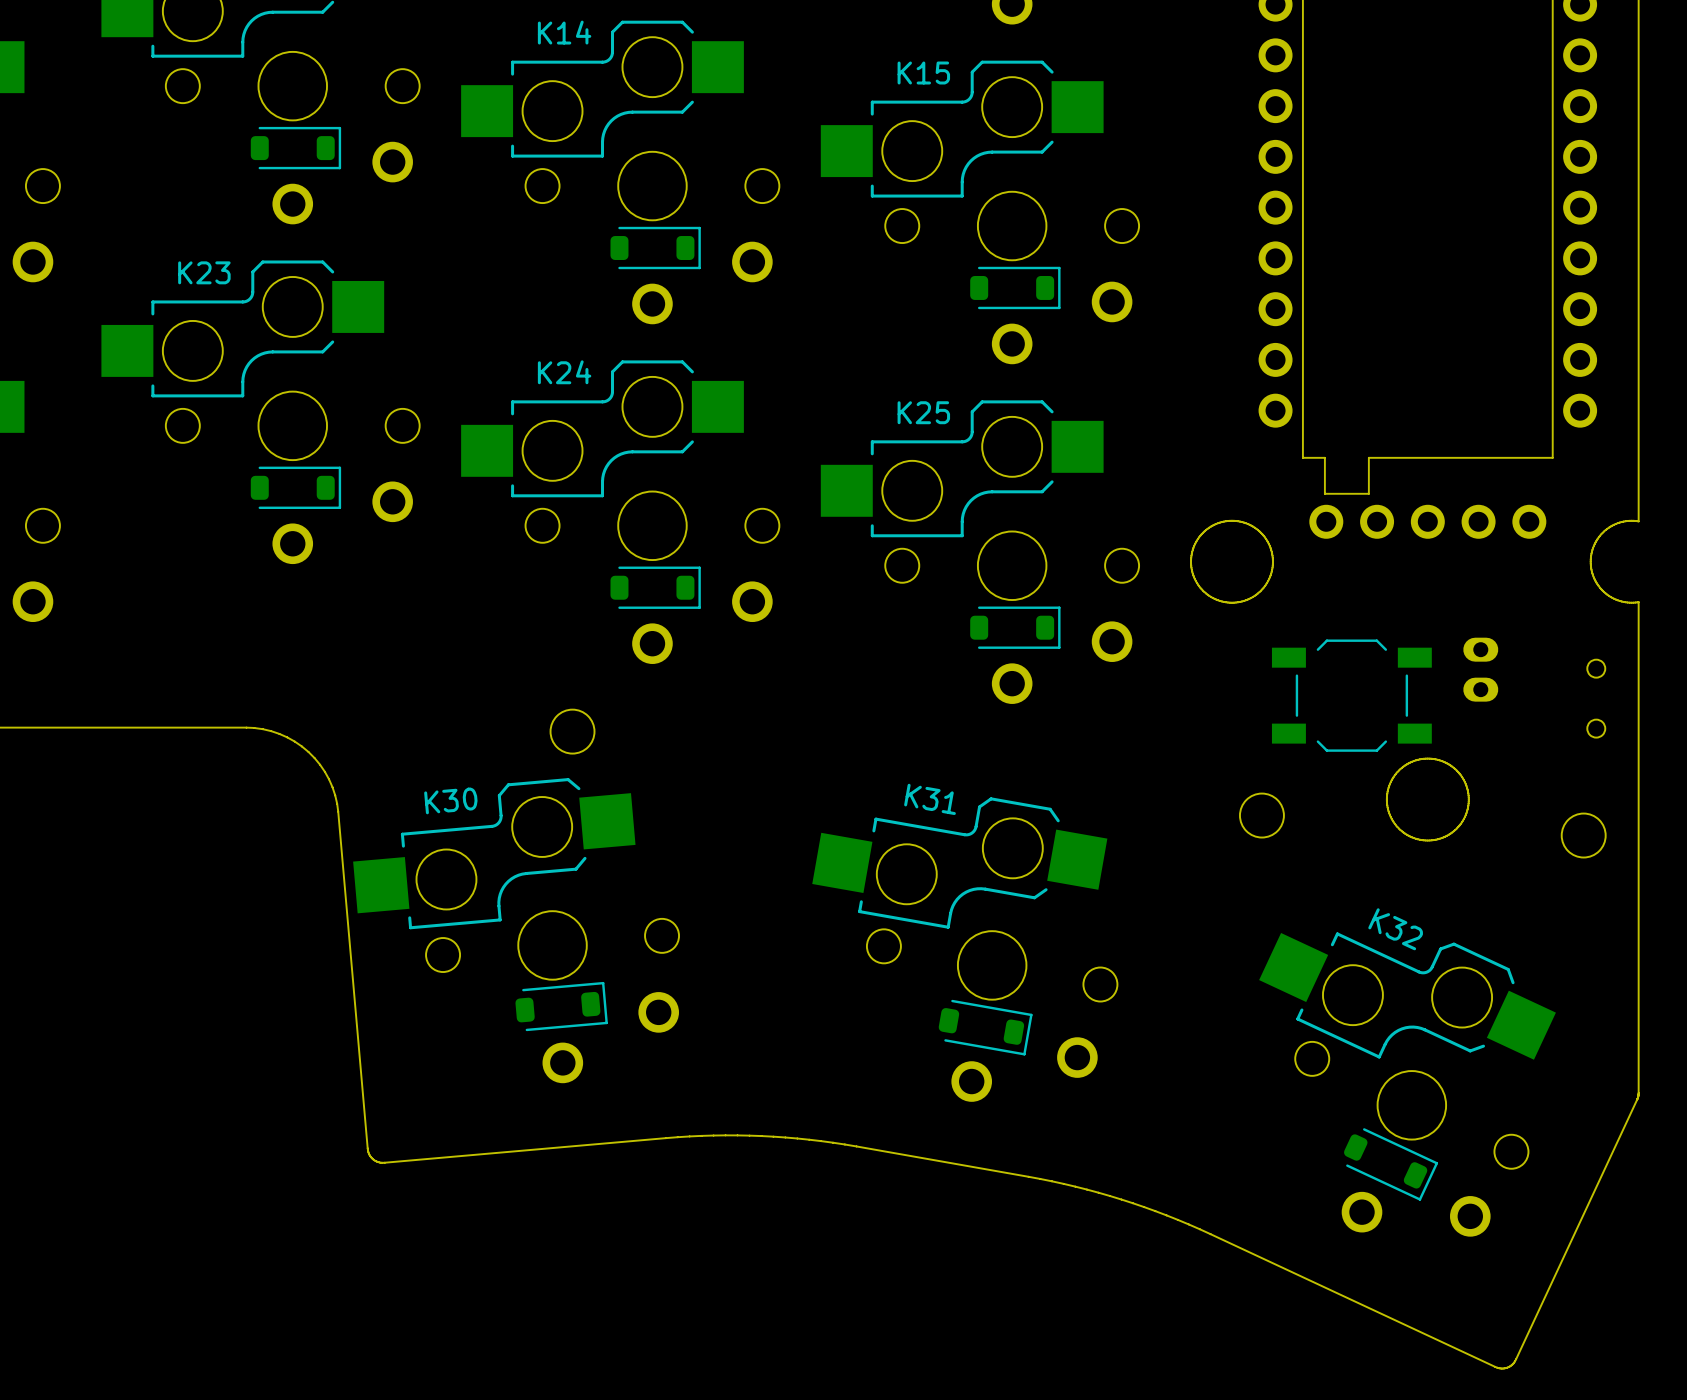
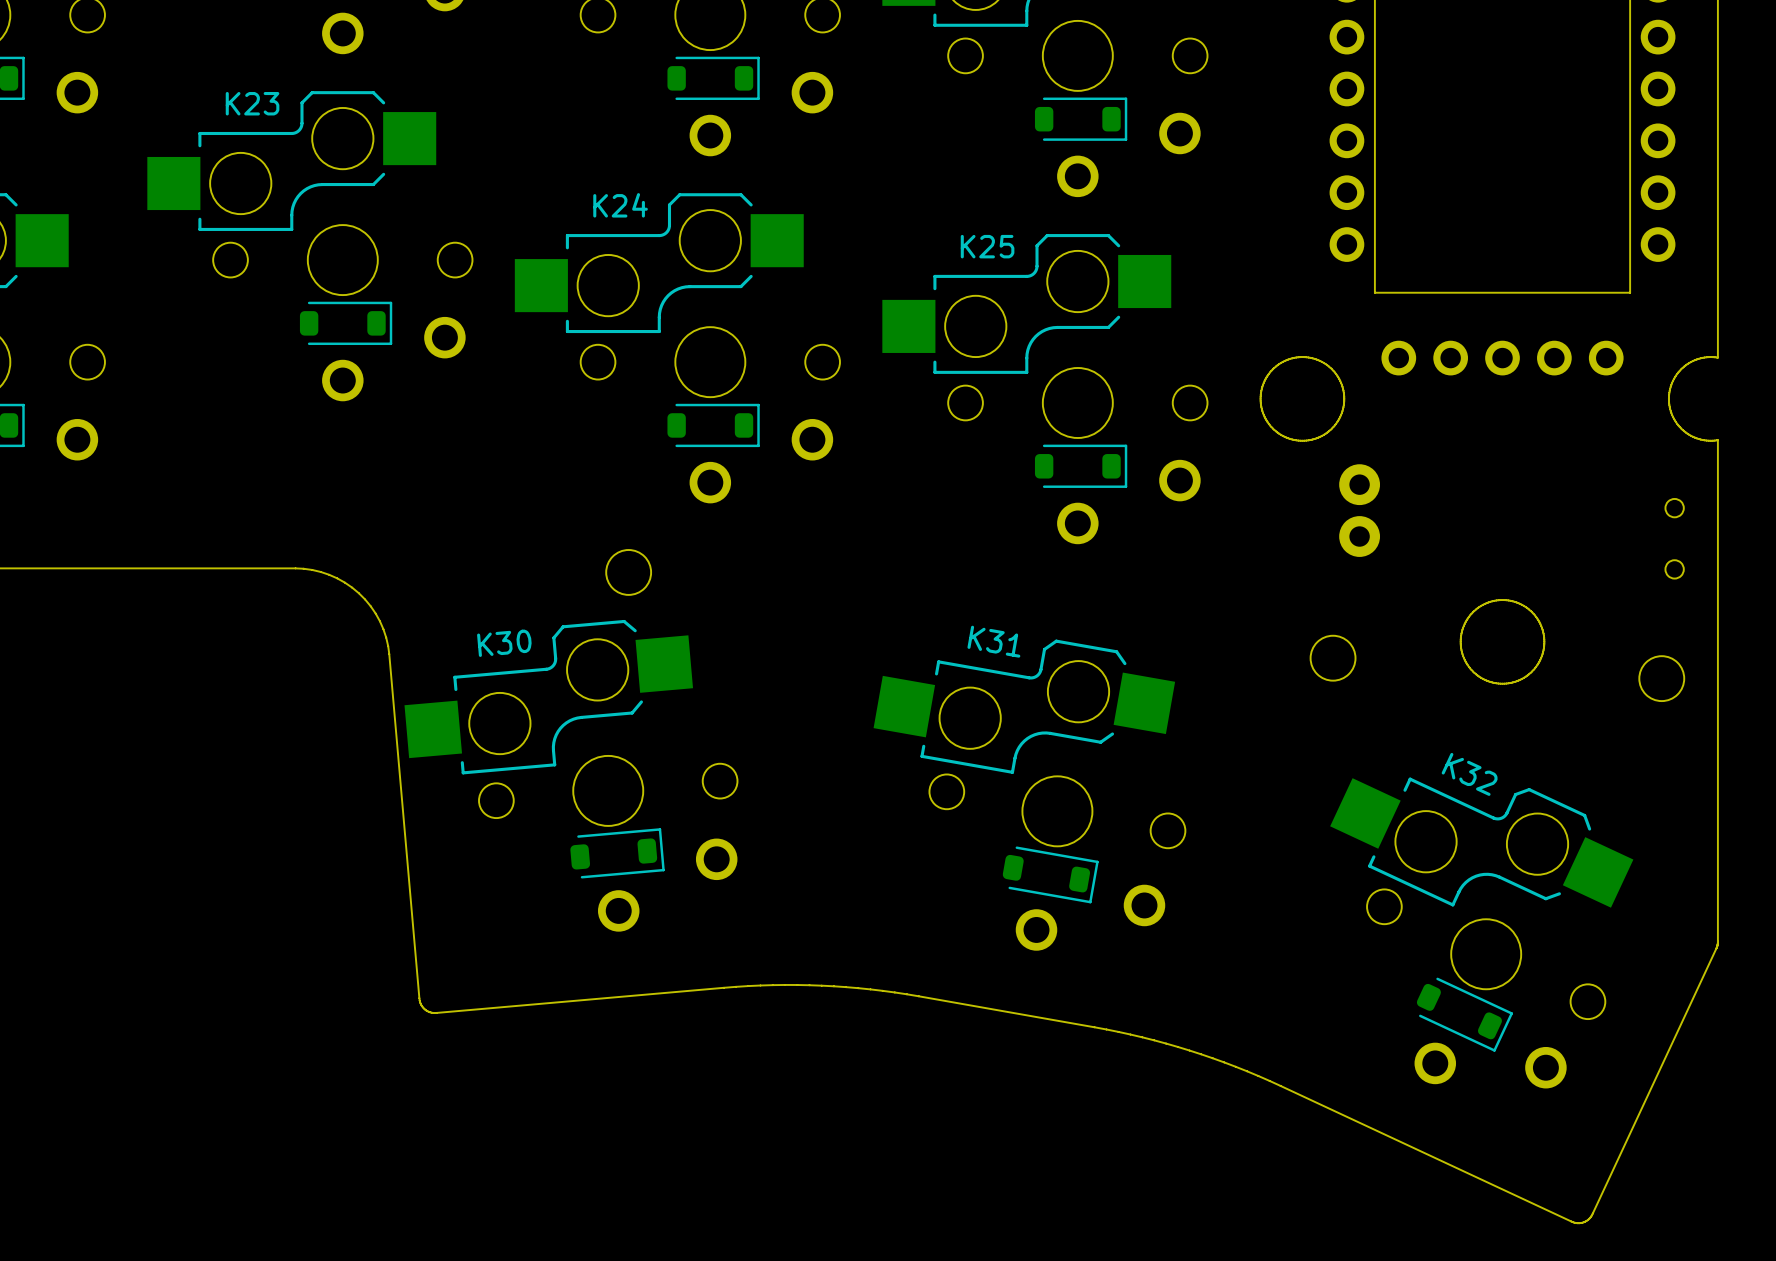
board edge: (1368, 457) (1368, 493) (1324, 493) (1324, 457) -> (1442, 292) (1397, 292)
part: (1480, 669) -> none
part: none -> (1359, 510)
part: (1351, 695) -> none

